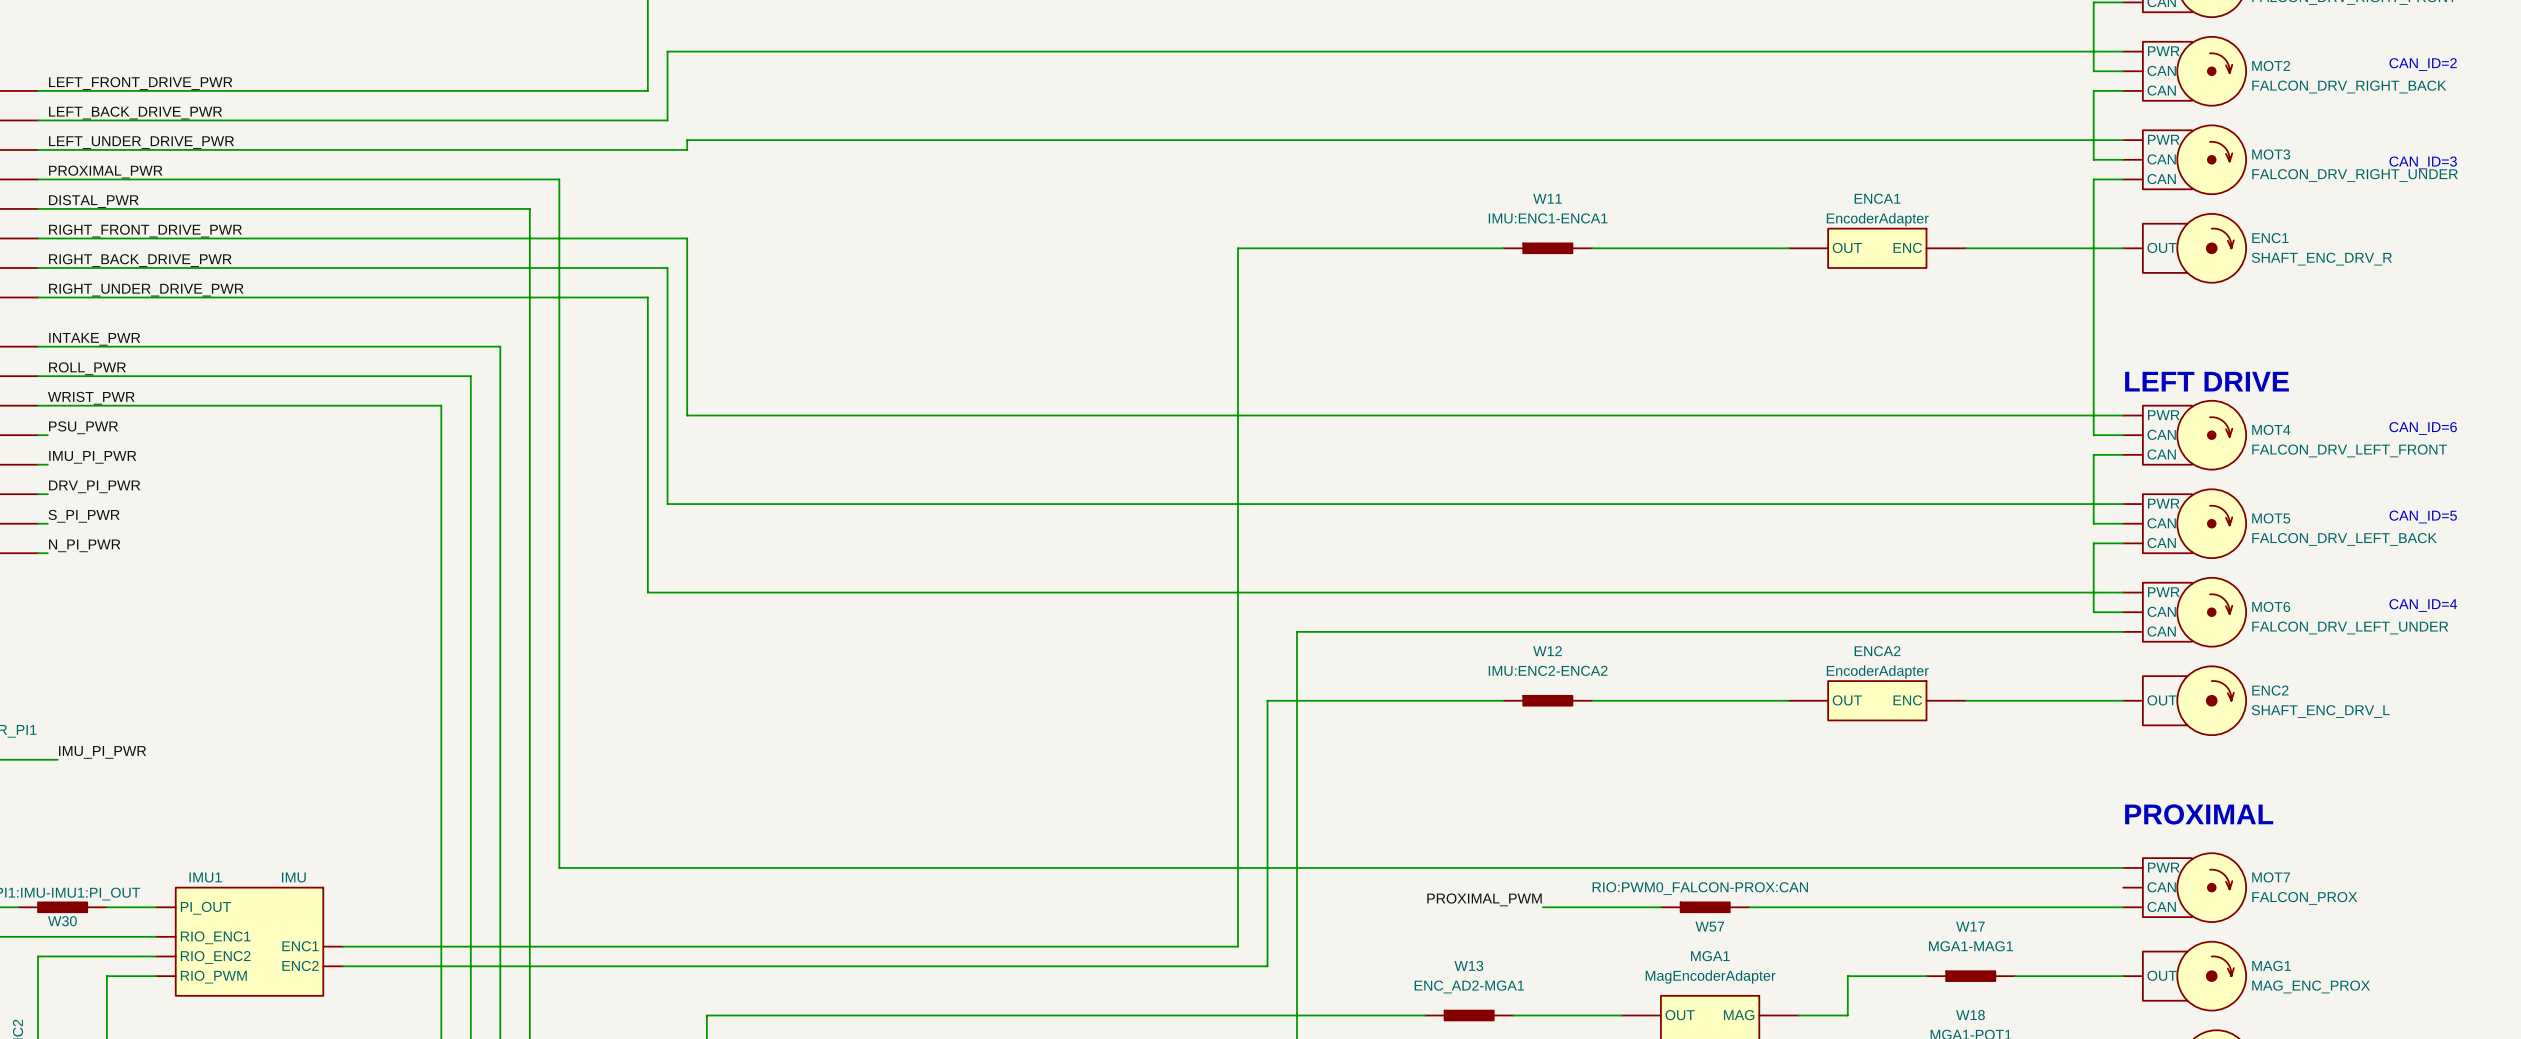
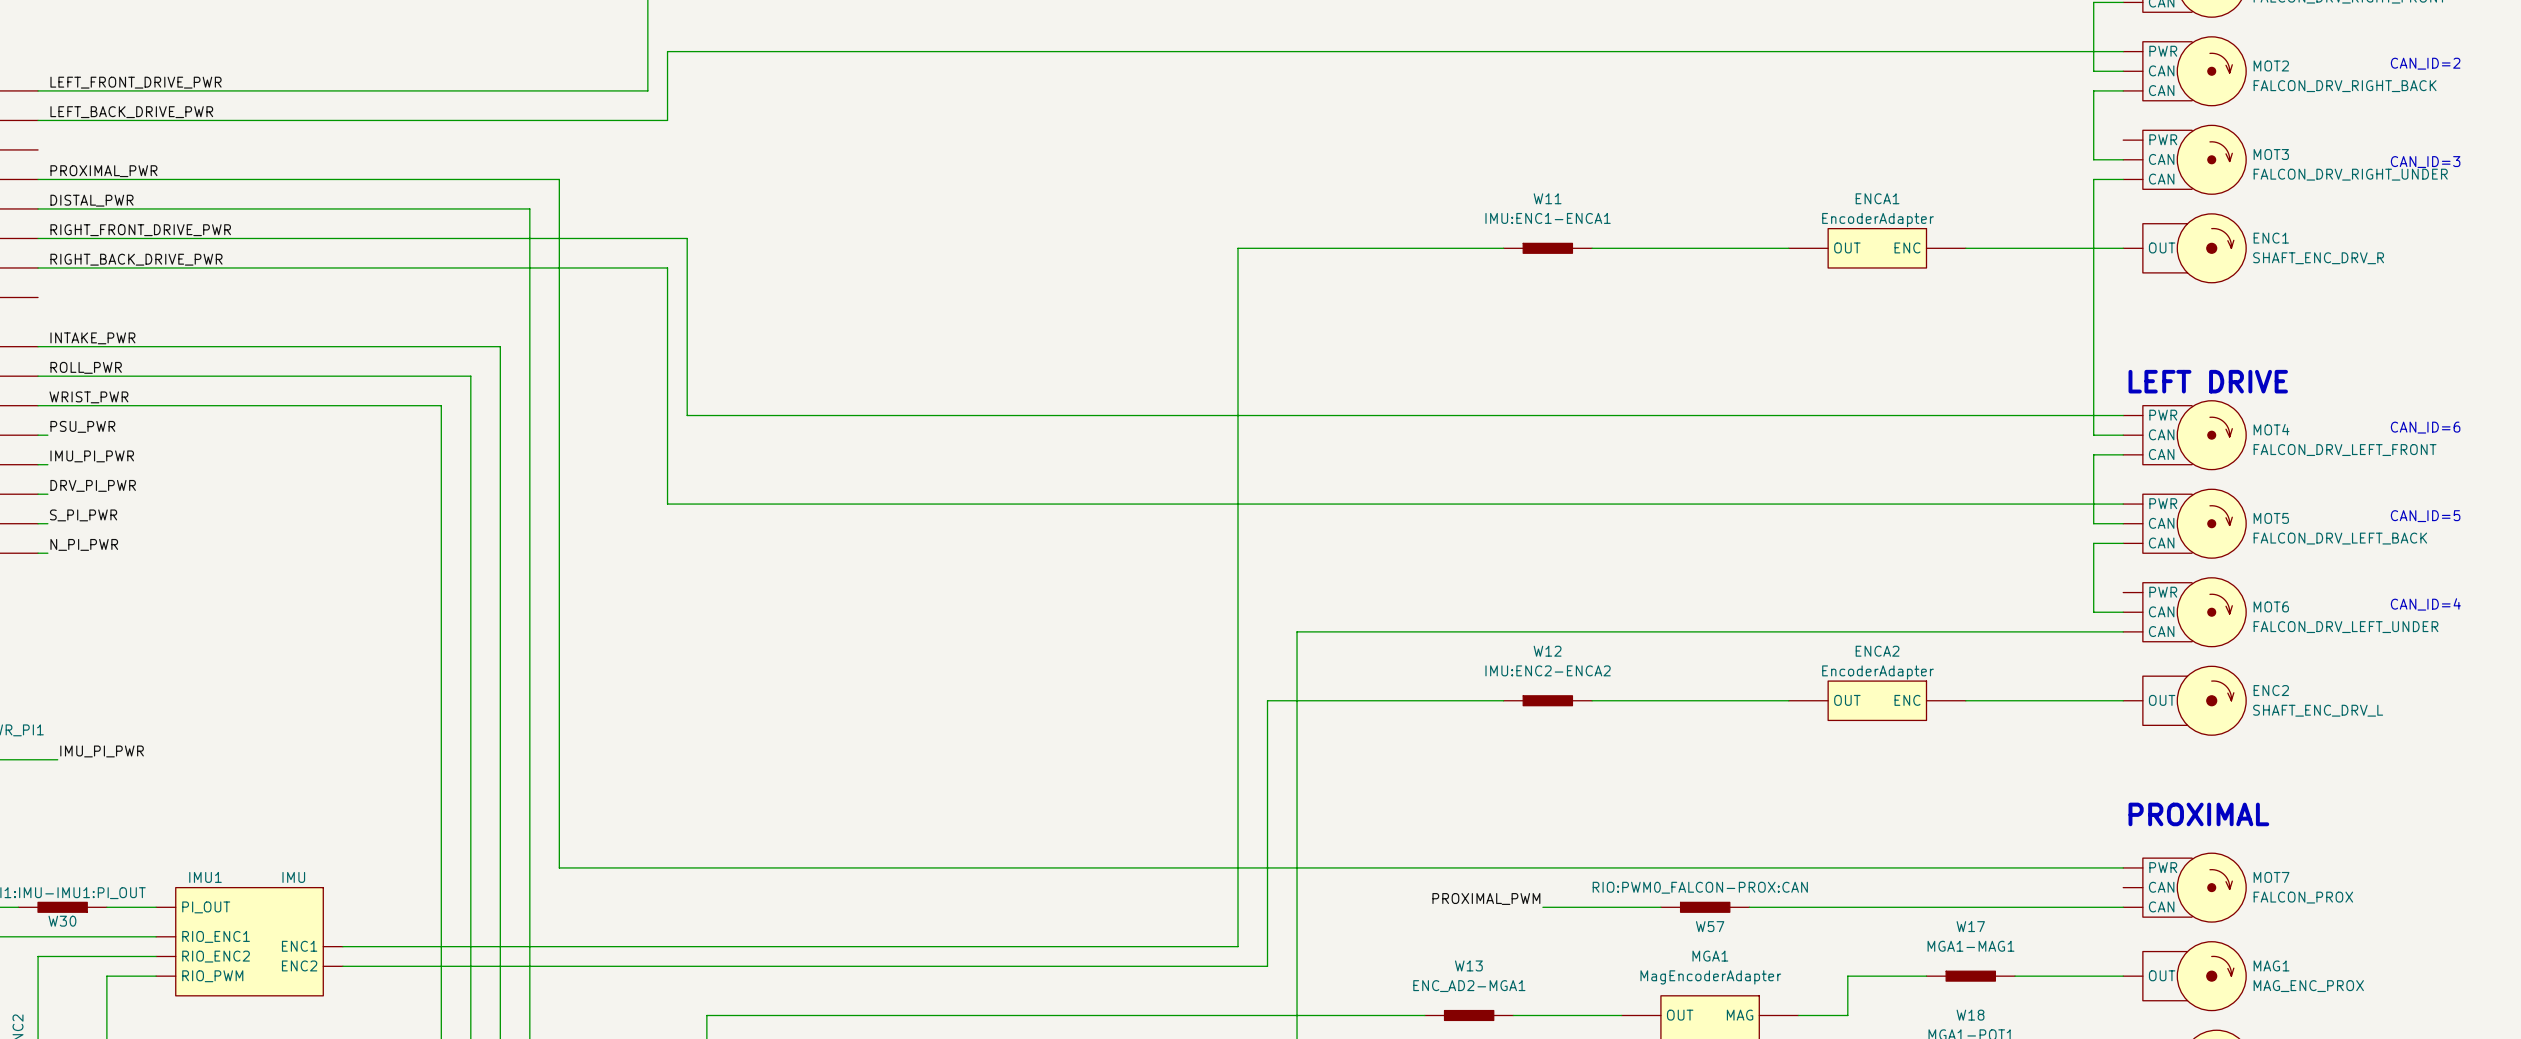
wire: (2123, 140) (687, 140) (687, 149) (38, 149) -> none
label: LEFT_UNDER_DRIVE_PWR (141, 142) -> none
label: RIGHT_UNDER_DRIVE_PWR (146, 290) -> none
wire: (38, 297) (647, 297) (647, 592) (2123, 592) -> none

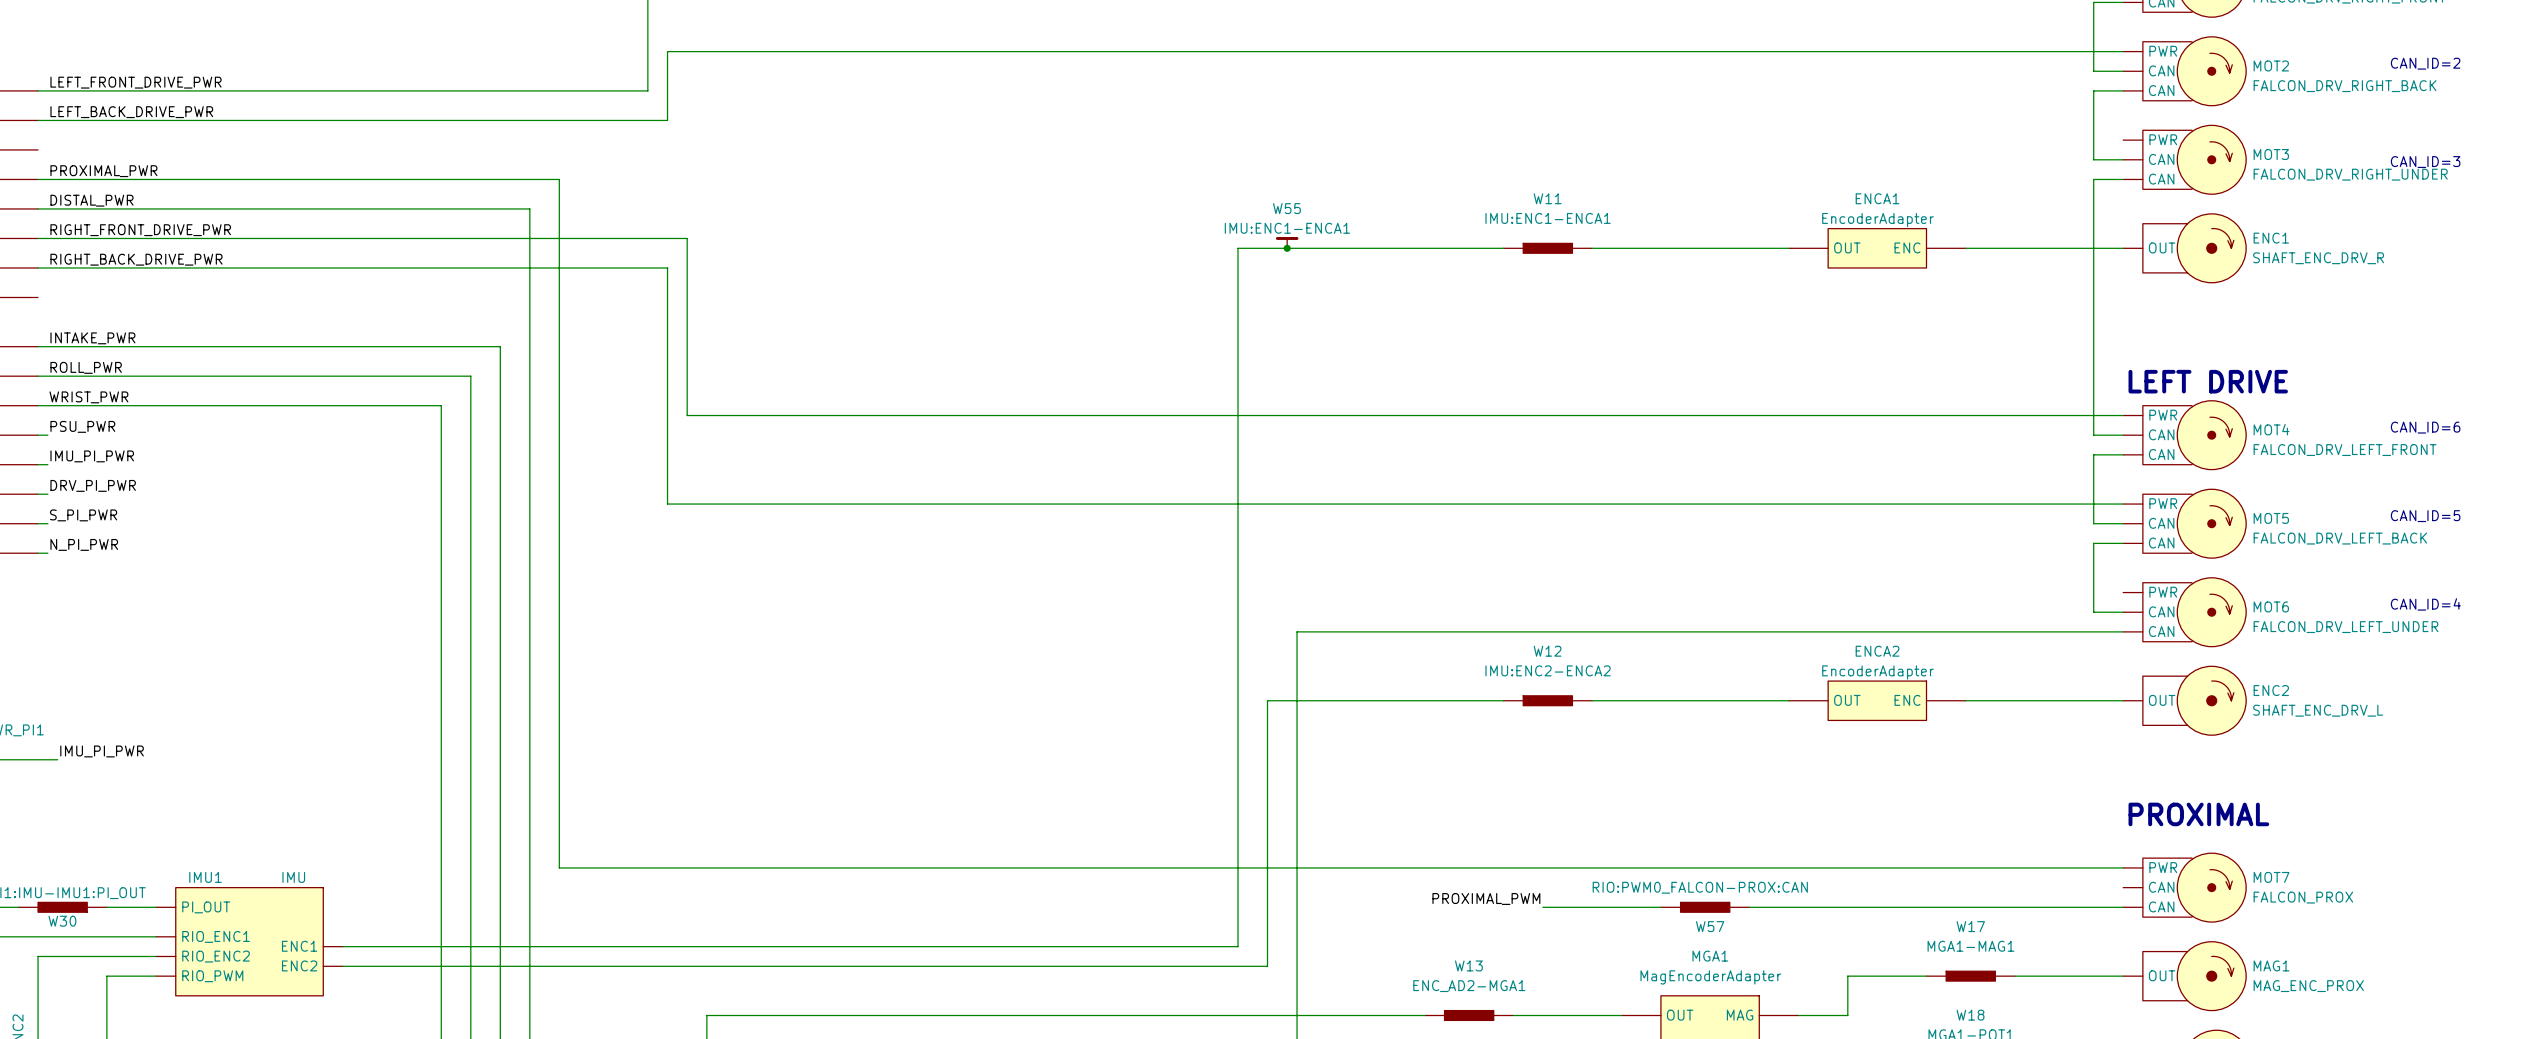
W55: none -> IMU:ENC1-ENCA1 (1287, 242)
junction: none -> (1287, 248)

